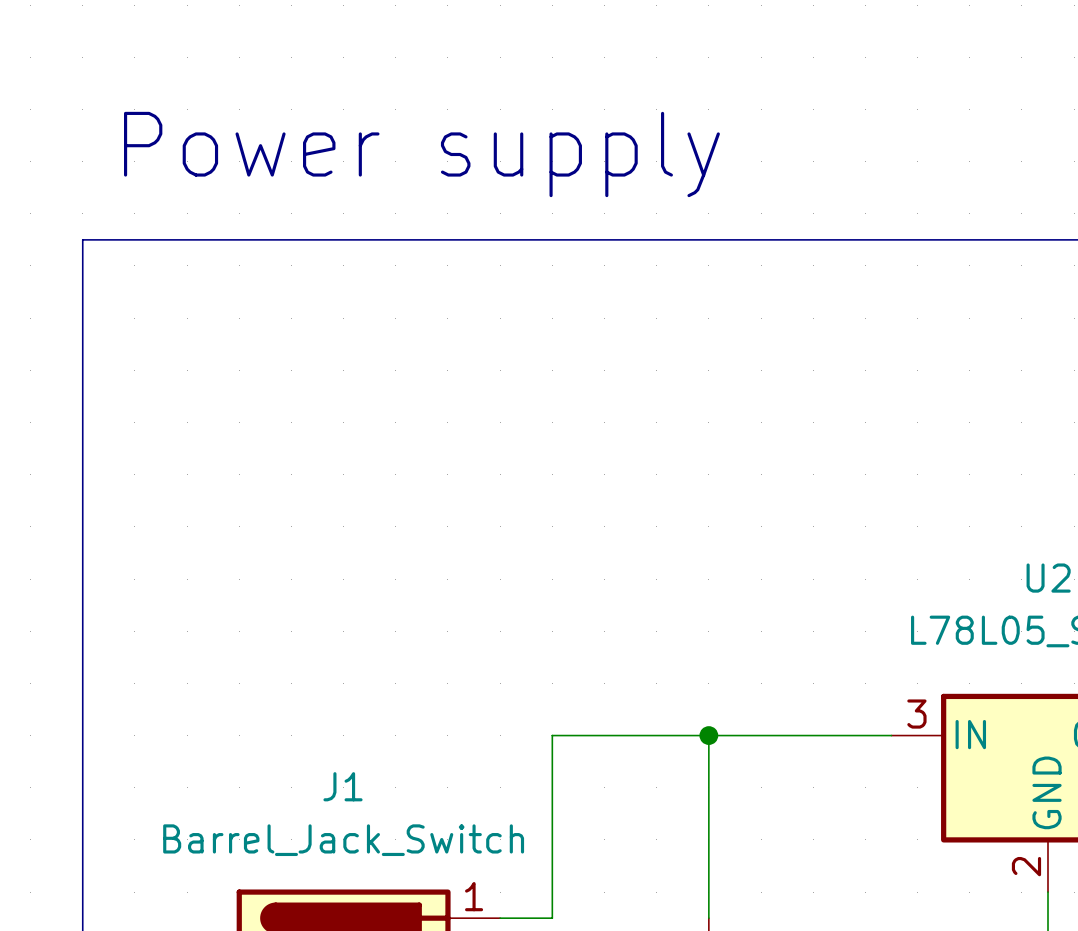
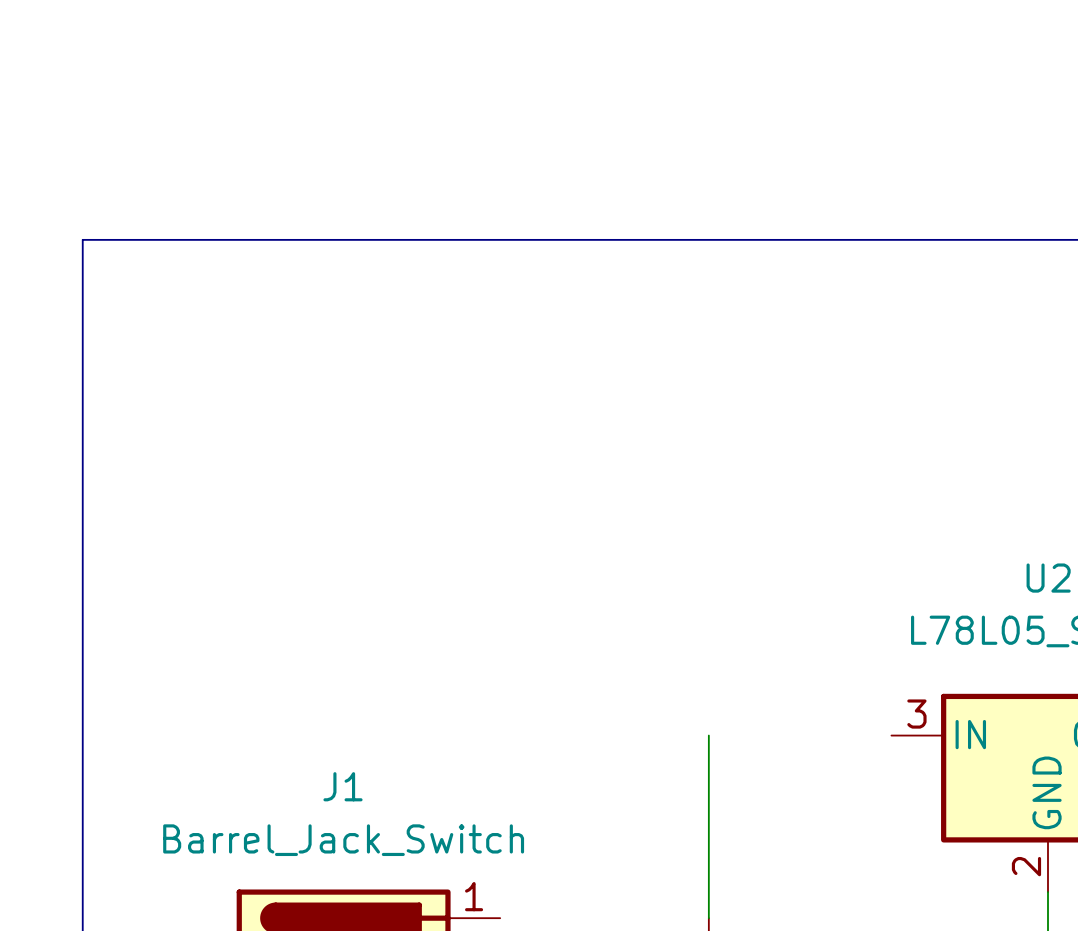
text: Power supply (421, 154) -> none
junction: (708, 735) -> none
wire: (891, 735) (552, 735) (552, 918) (500, 918) -> none

